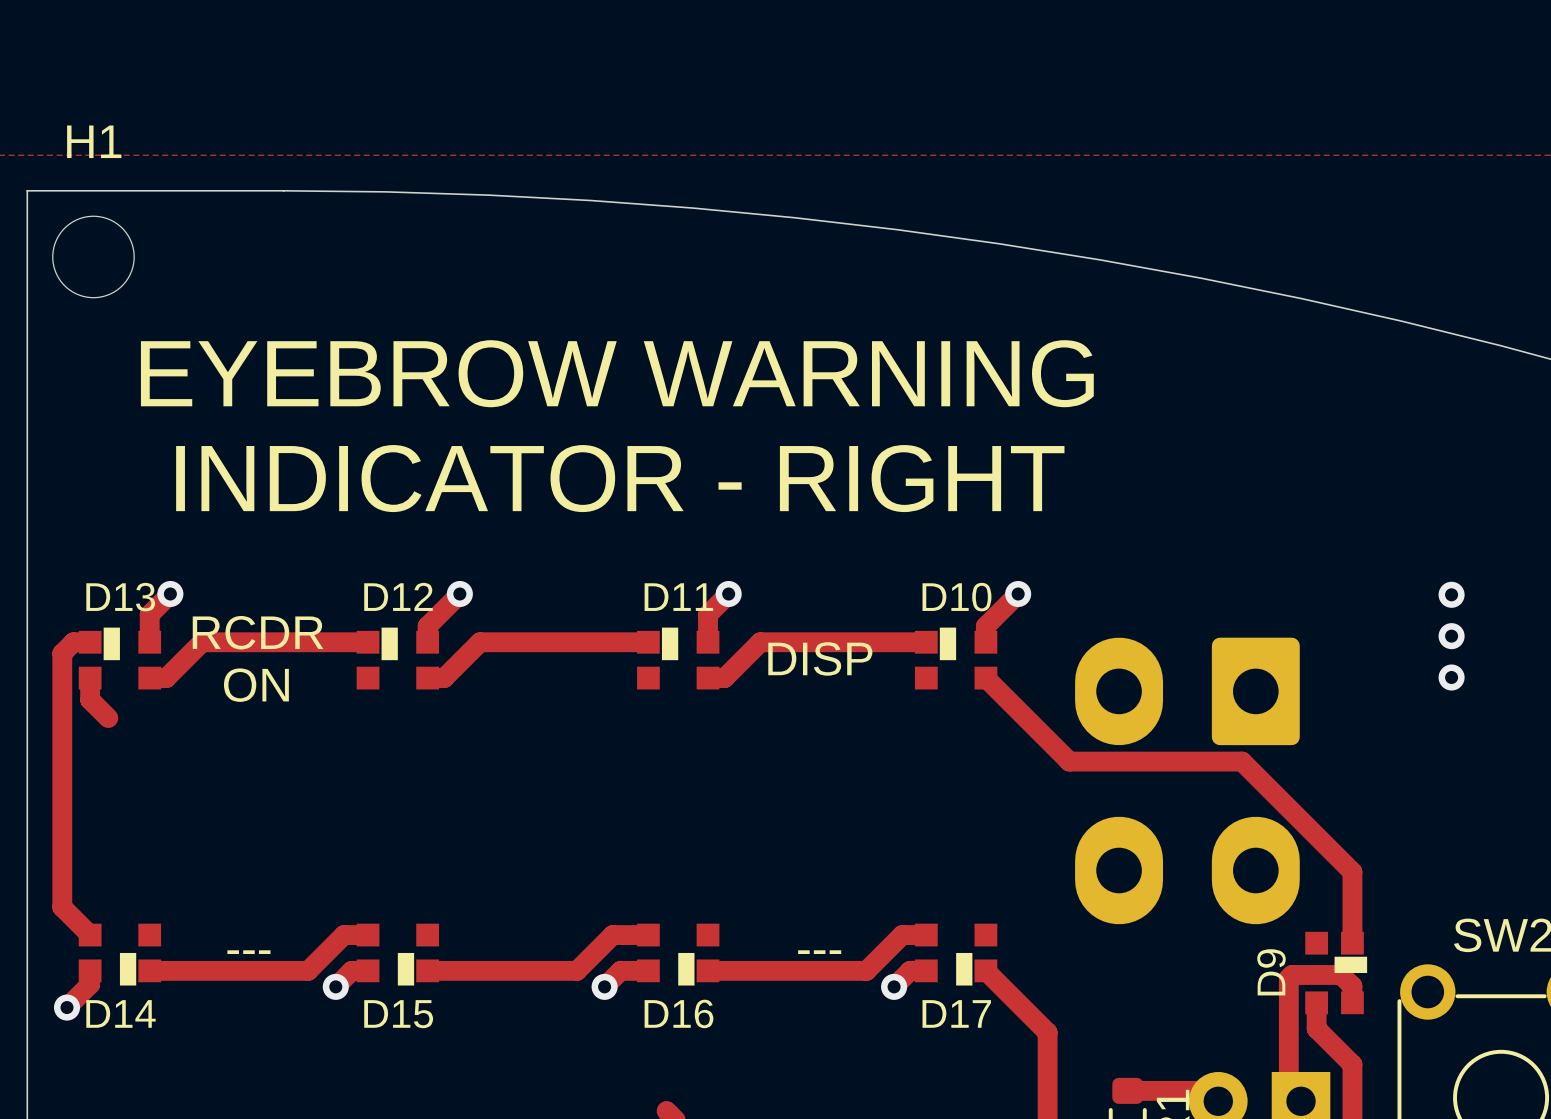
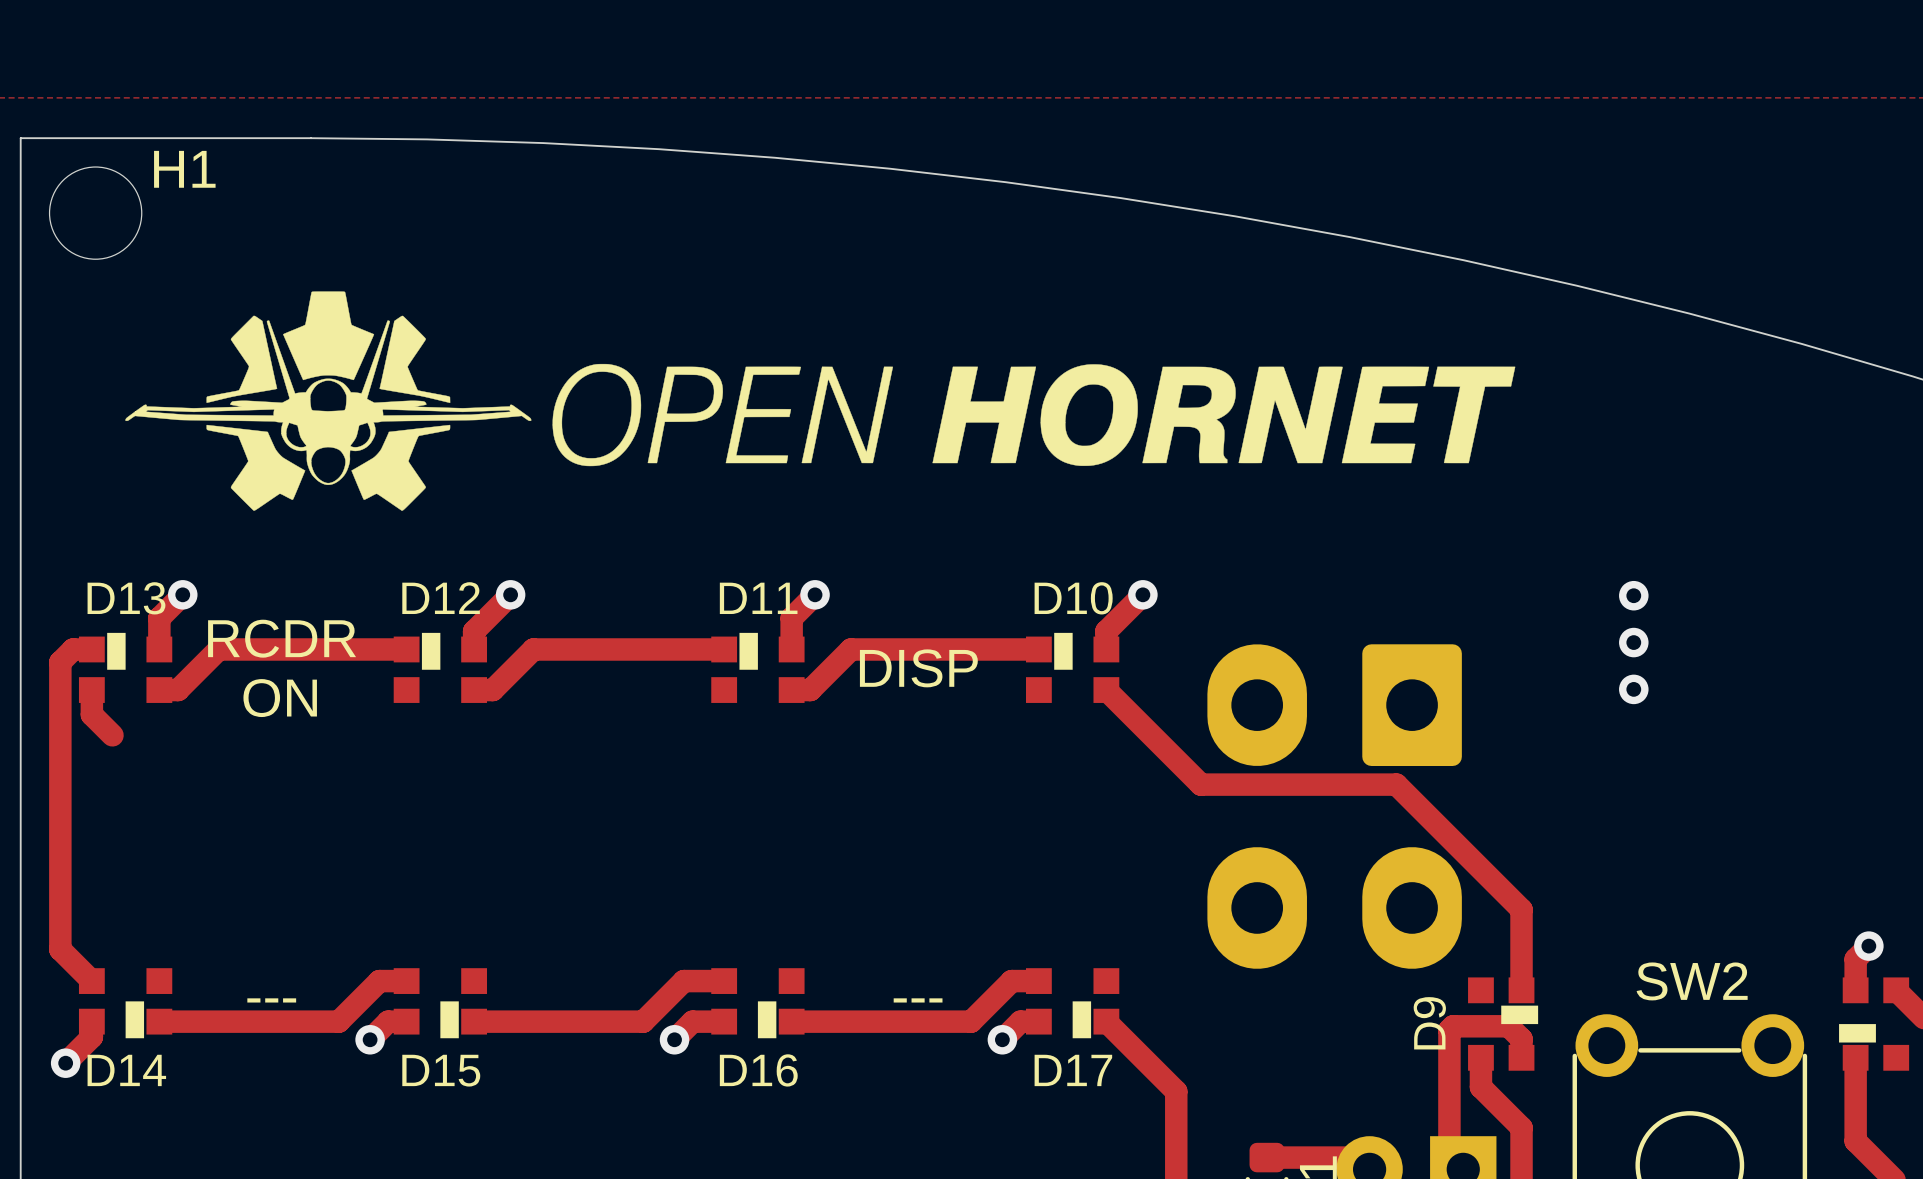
H1 name position: H1 (94, 141) -> H1 (184, 169)
drawing: none -> [125, 291, 1516, 511]
text: EYEBROW WARNING (617, 373) -> none
text: INDICATOR - RIGHT (620, 478) -> none

